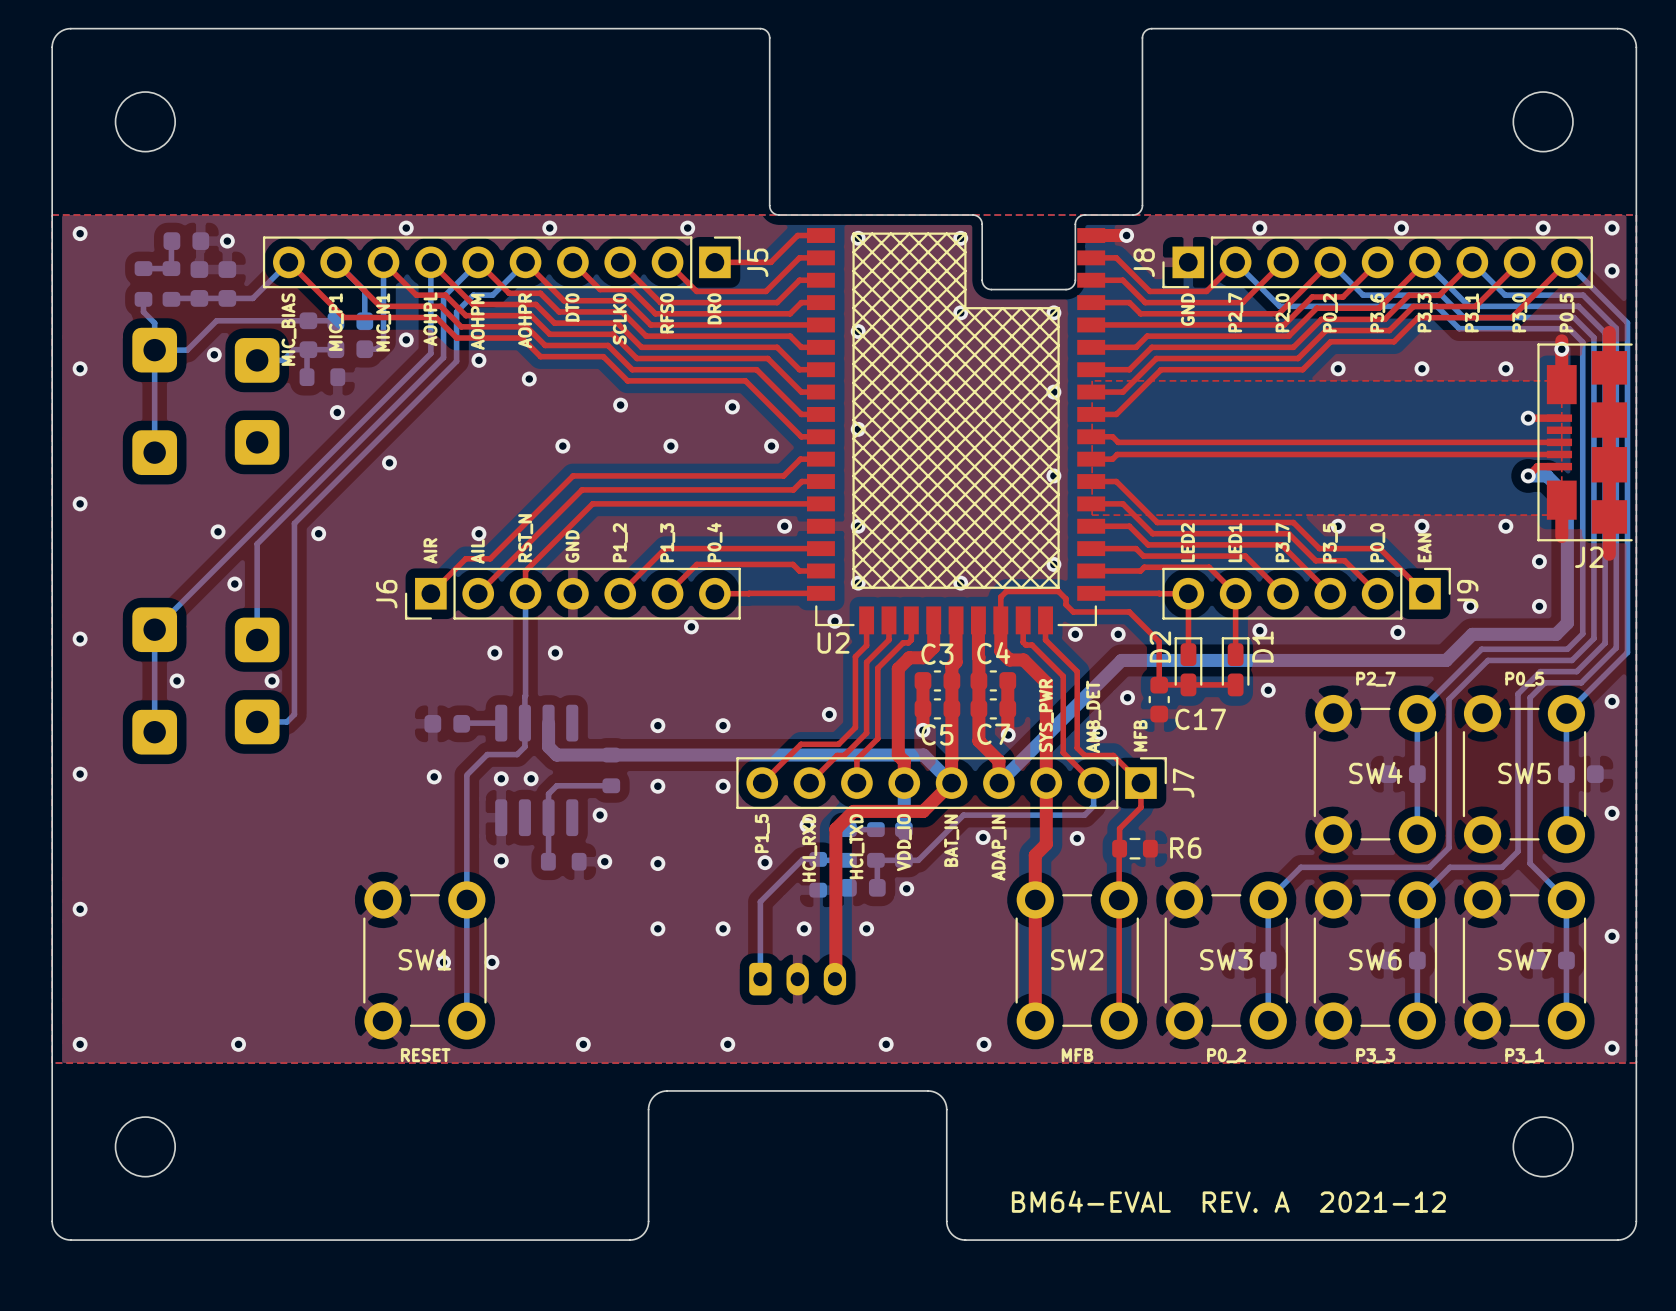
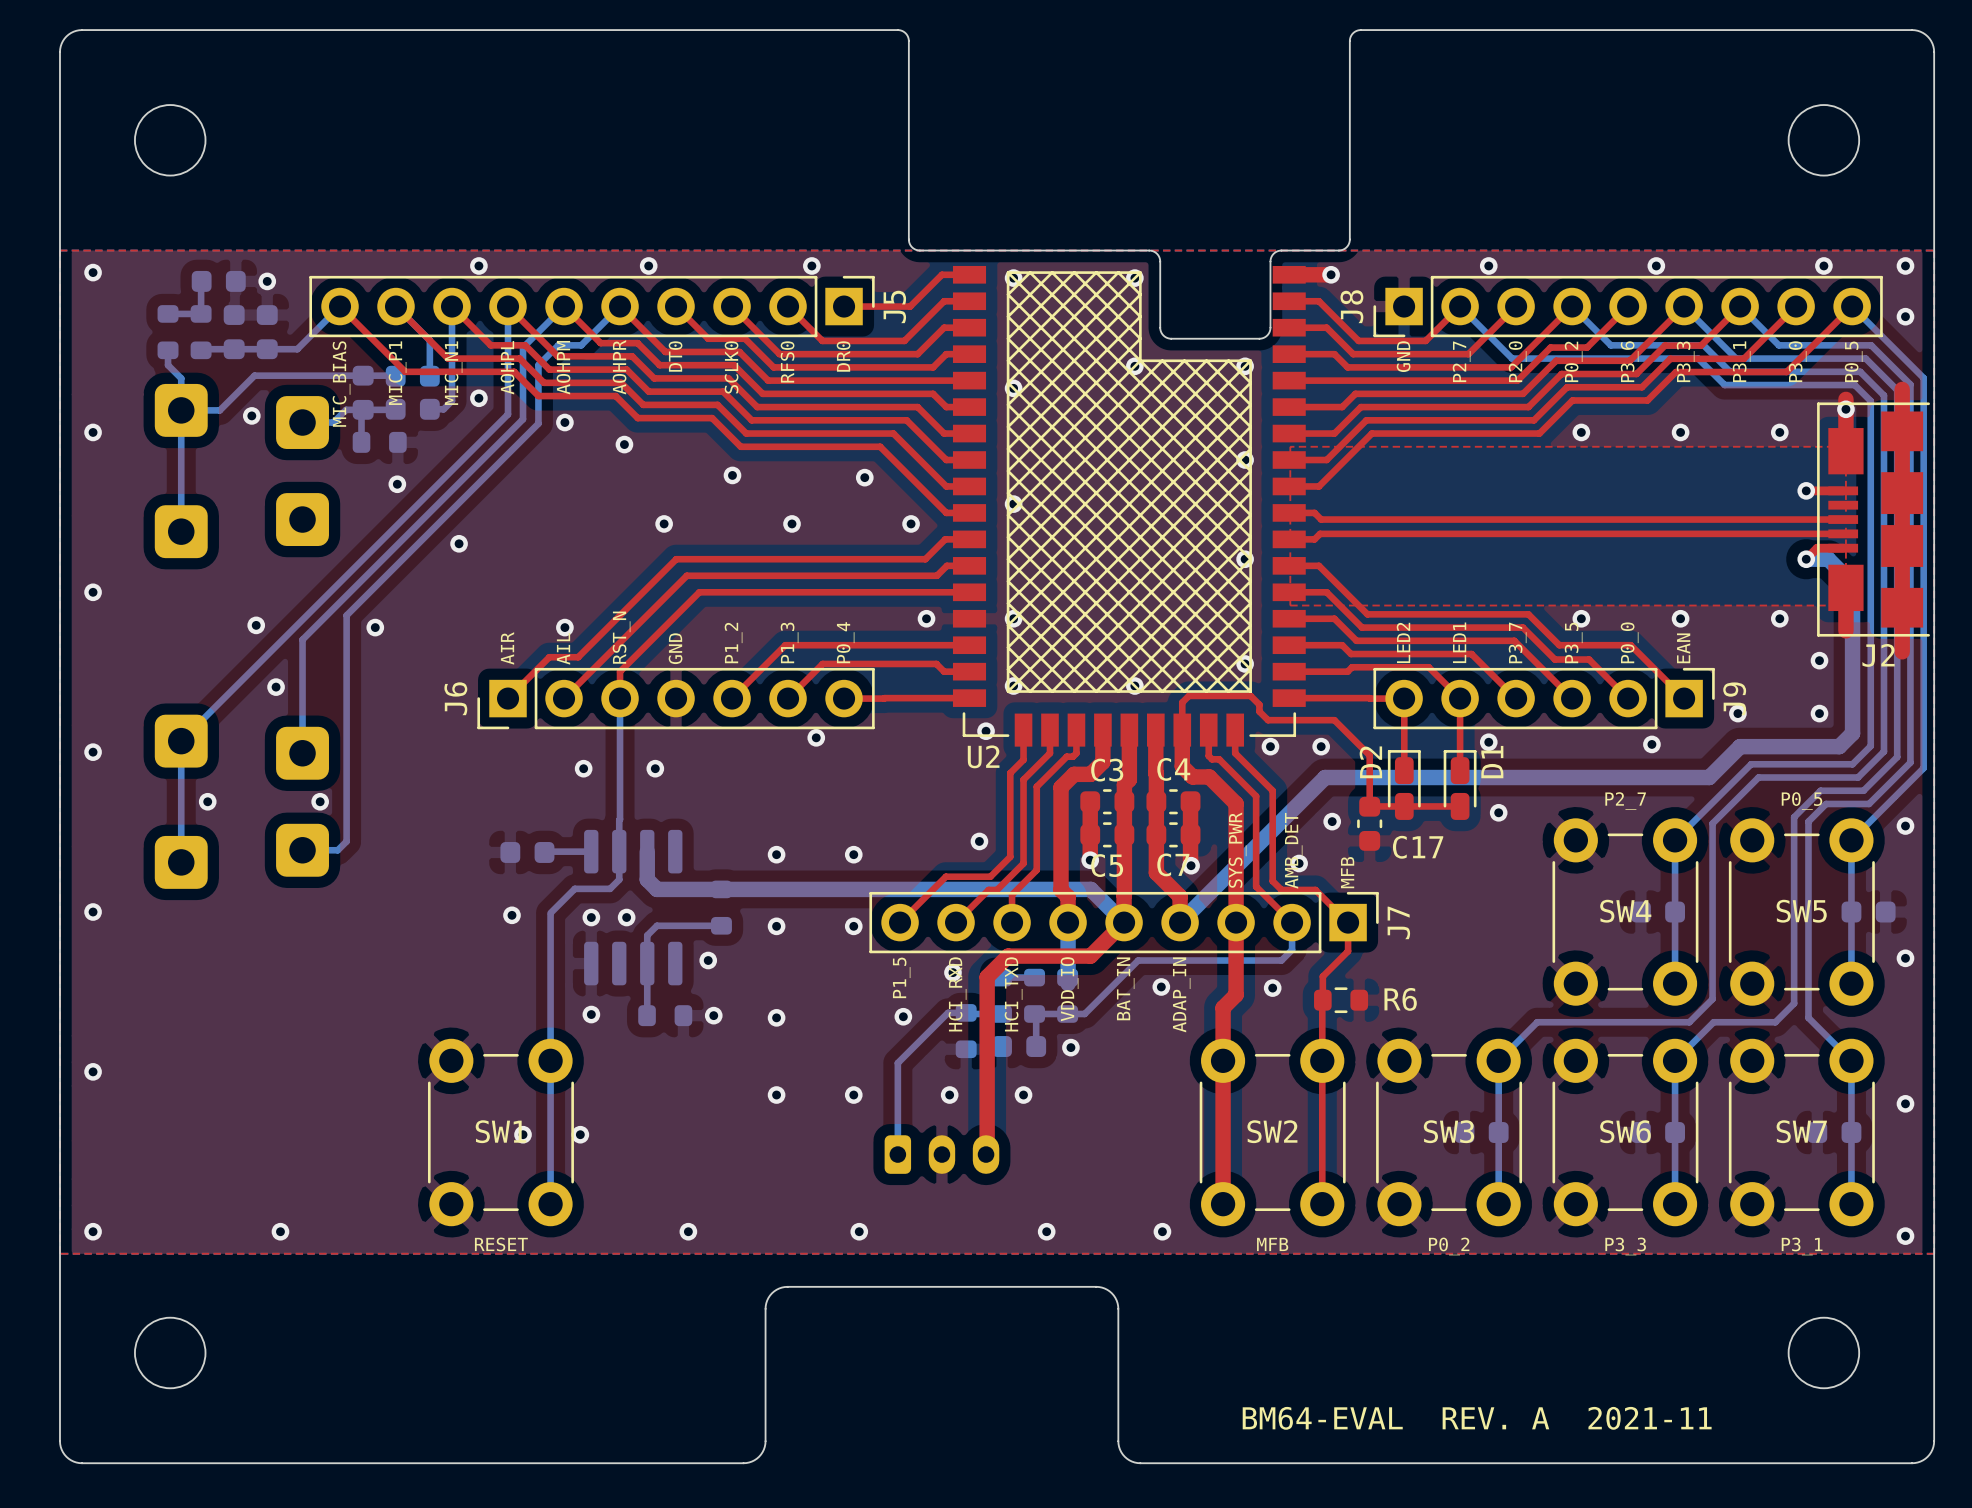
text: BM64-EVAL REV. A 2021-12 (1228, 1201) -> BM64-EVAL REV. A 2021-11 (1477, 1418)

